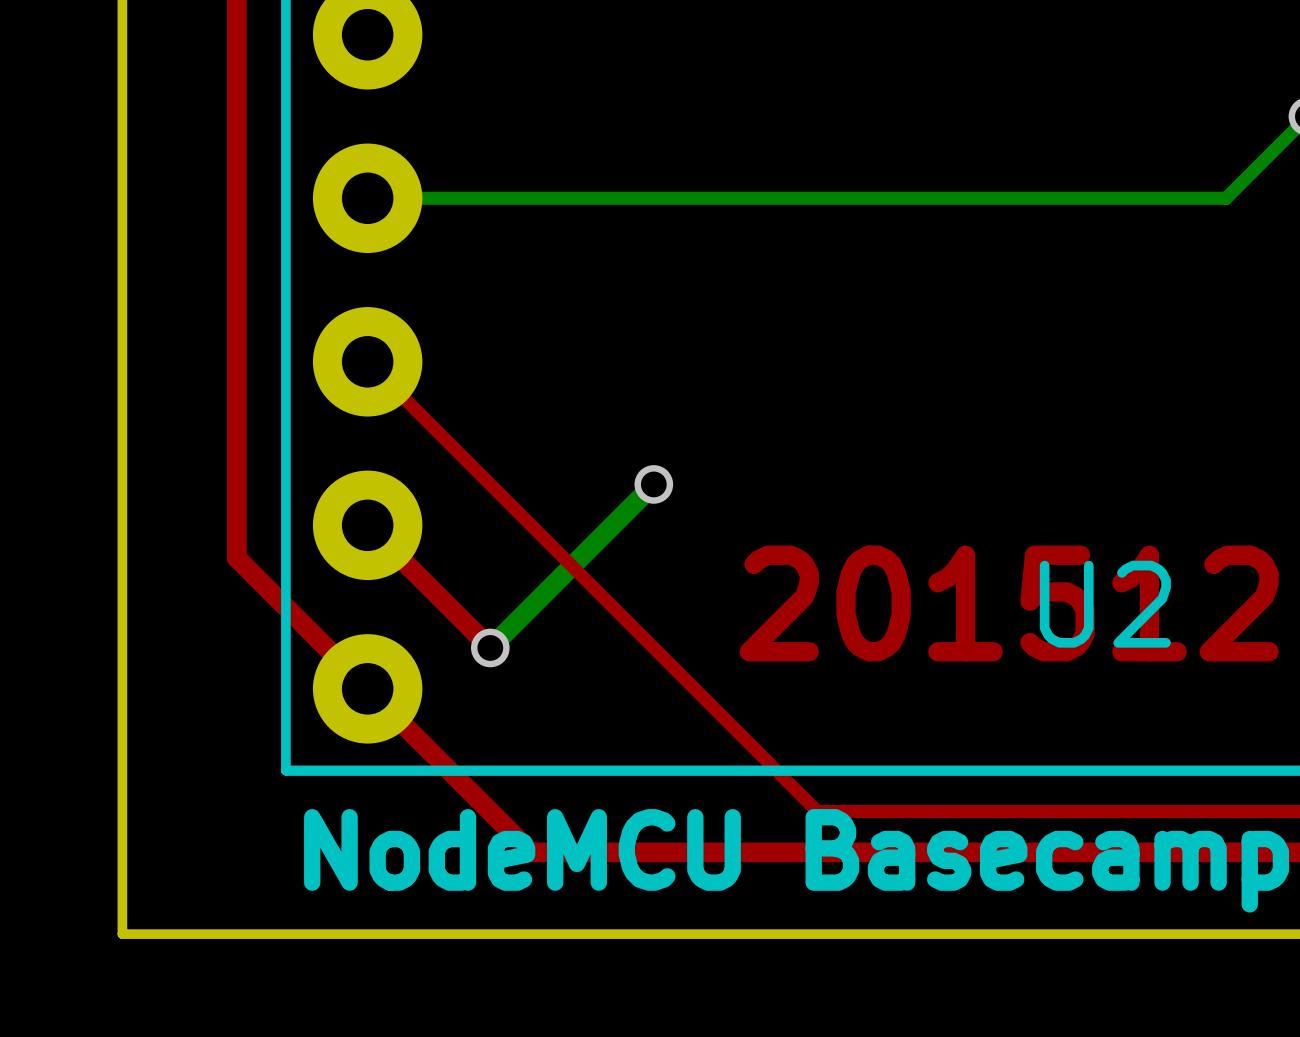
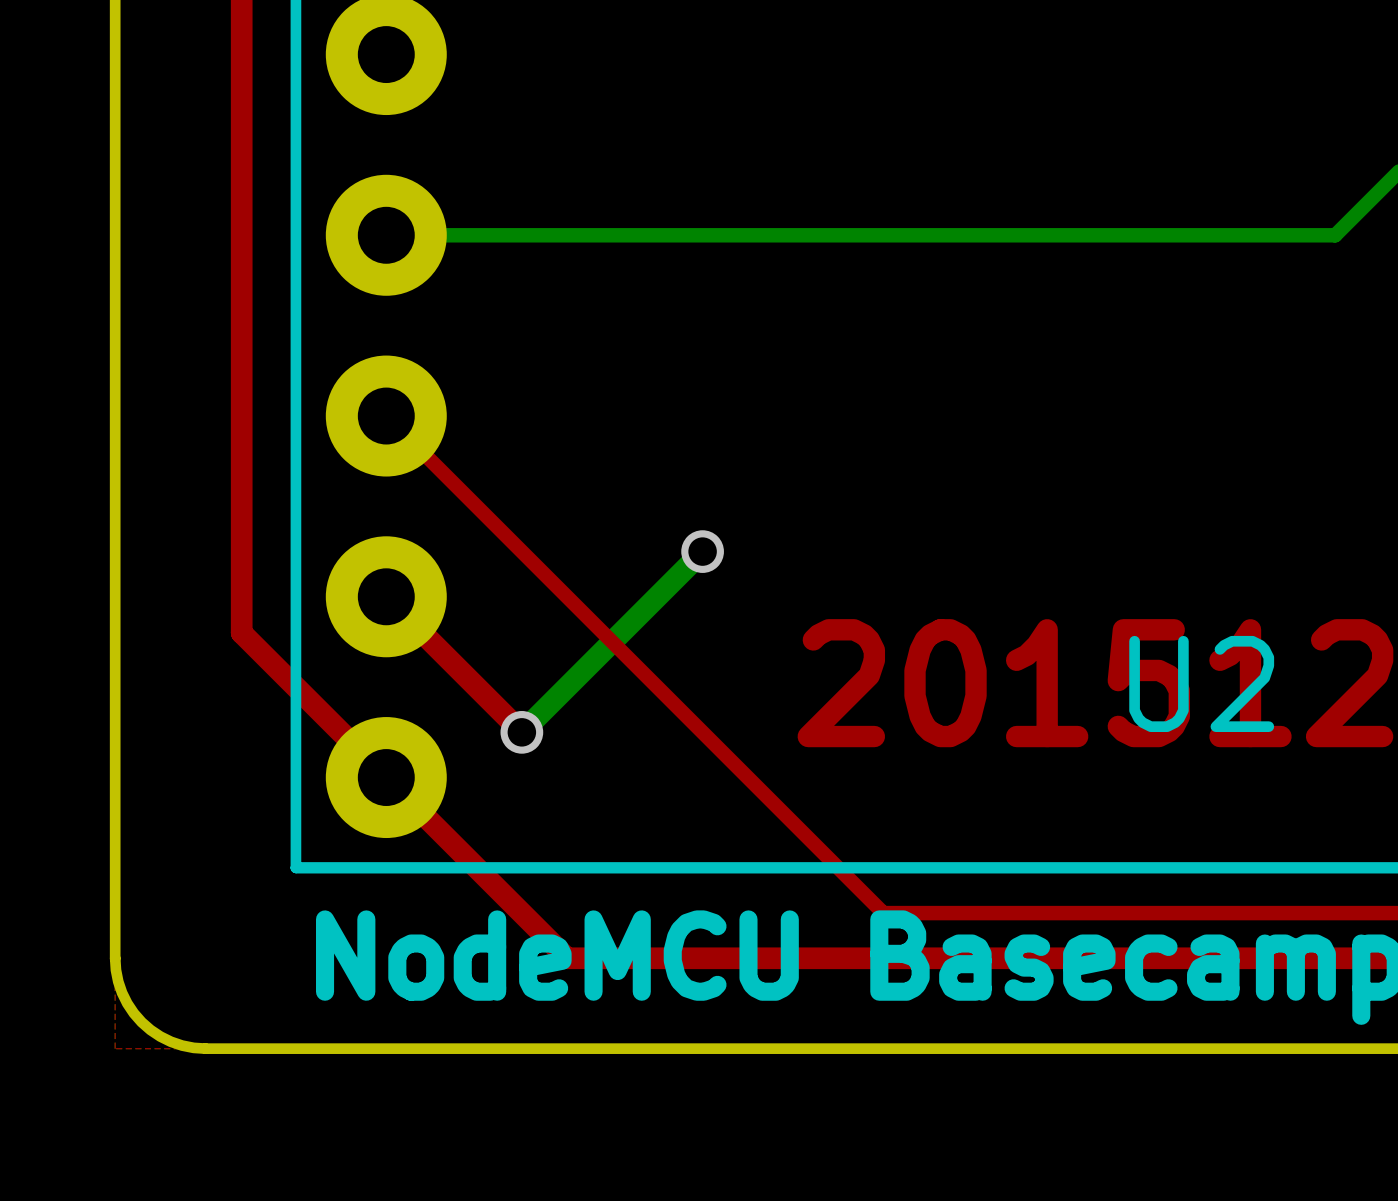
board edge: (122, 852) (122, 934) (204, 934) -> (115, 958) (115, 970) (122, 992) (127, 1003) (141, 1022) (160, 1036) (170, 1041) (193, 1047) (205, 1048)

